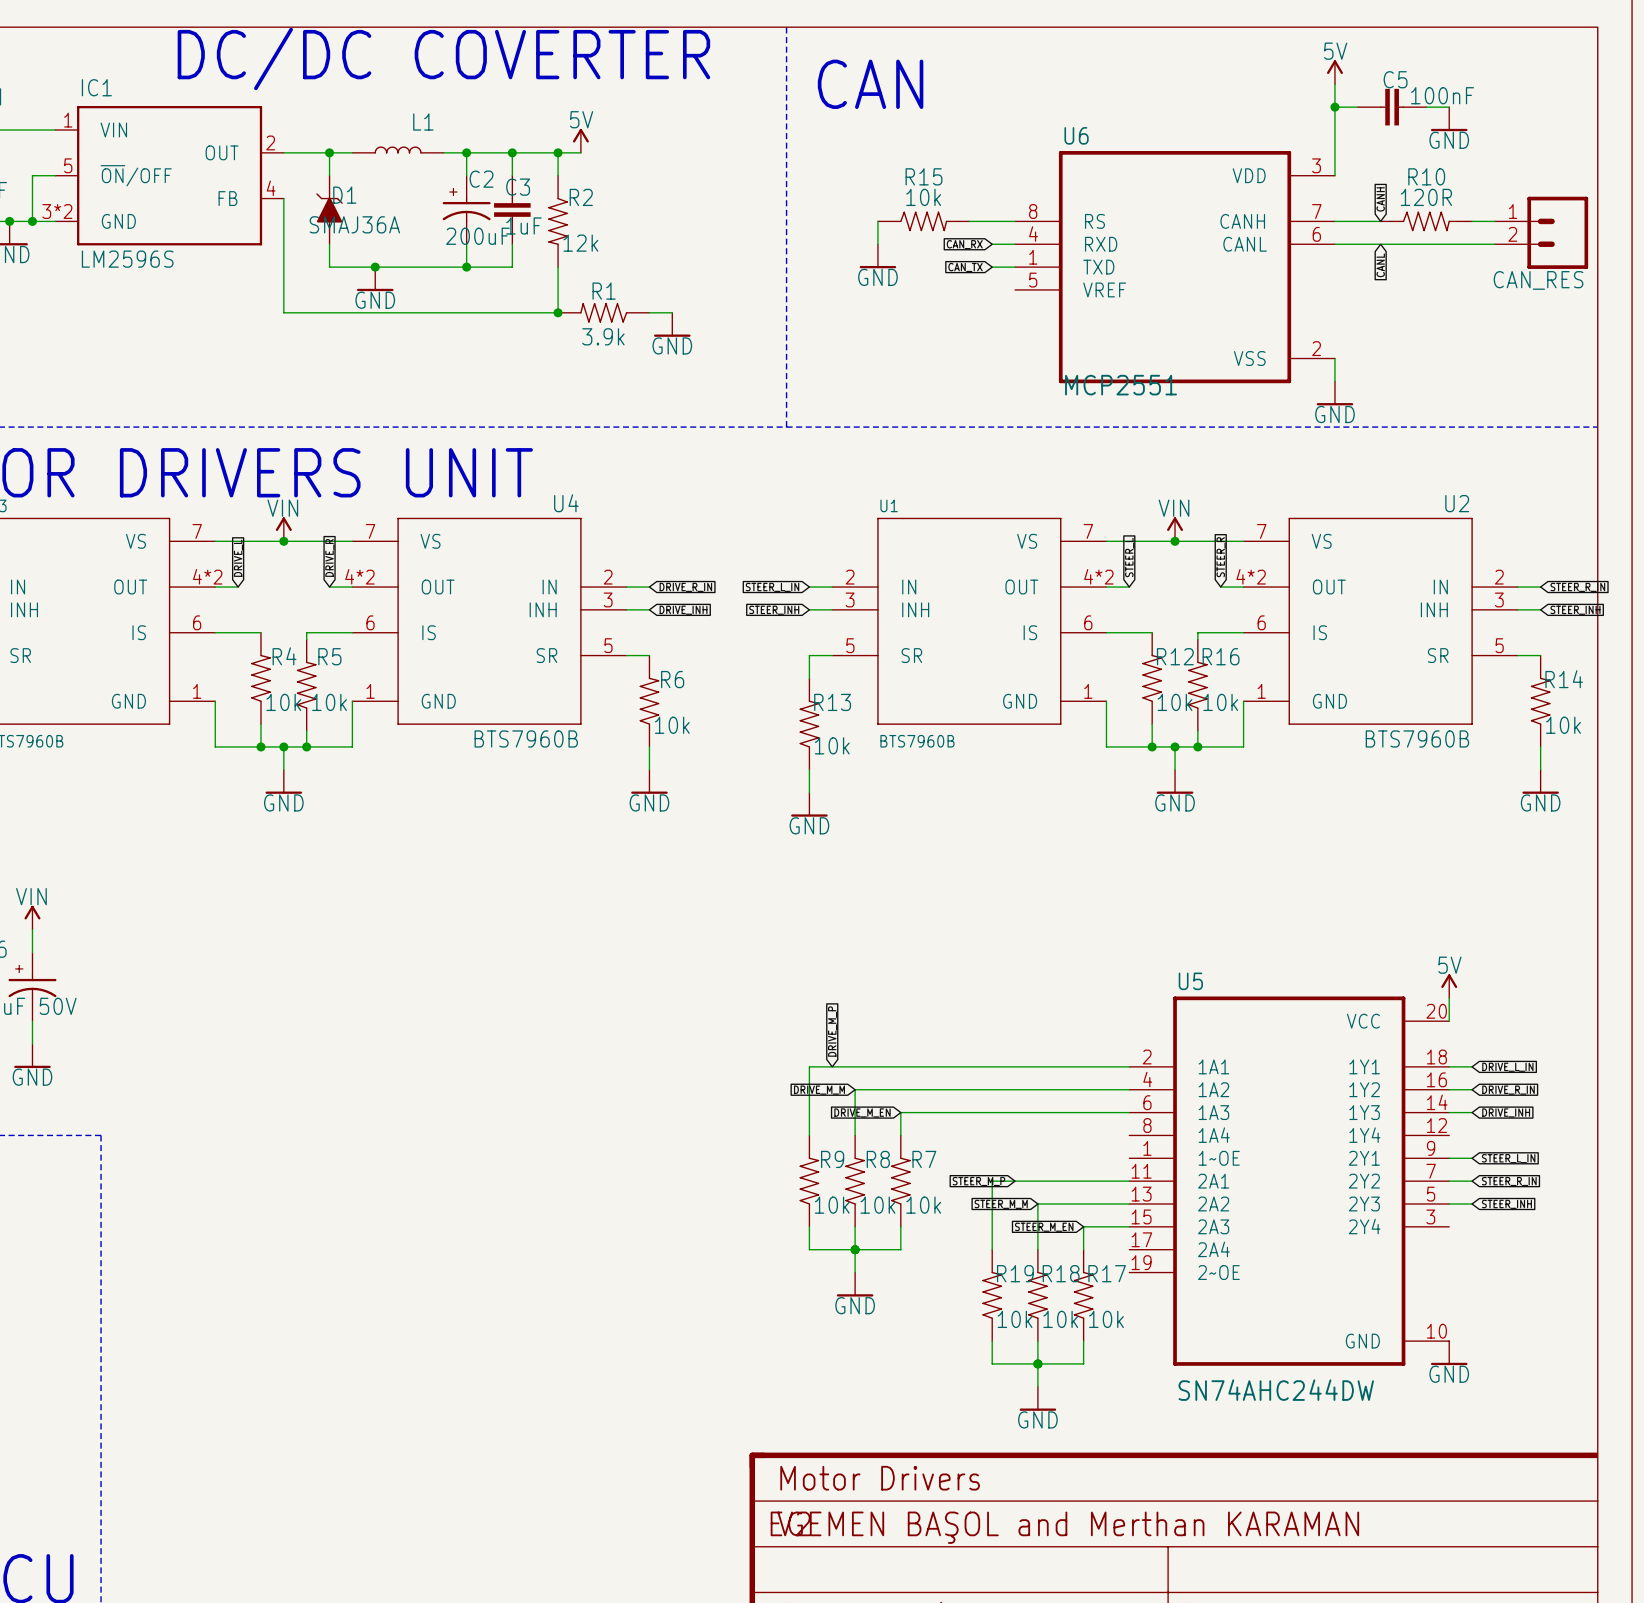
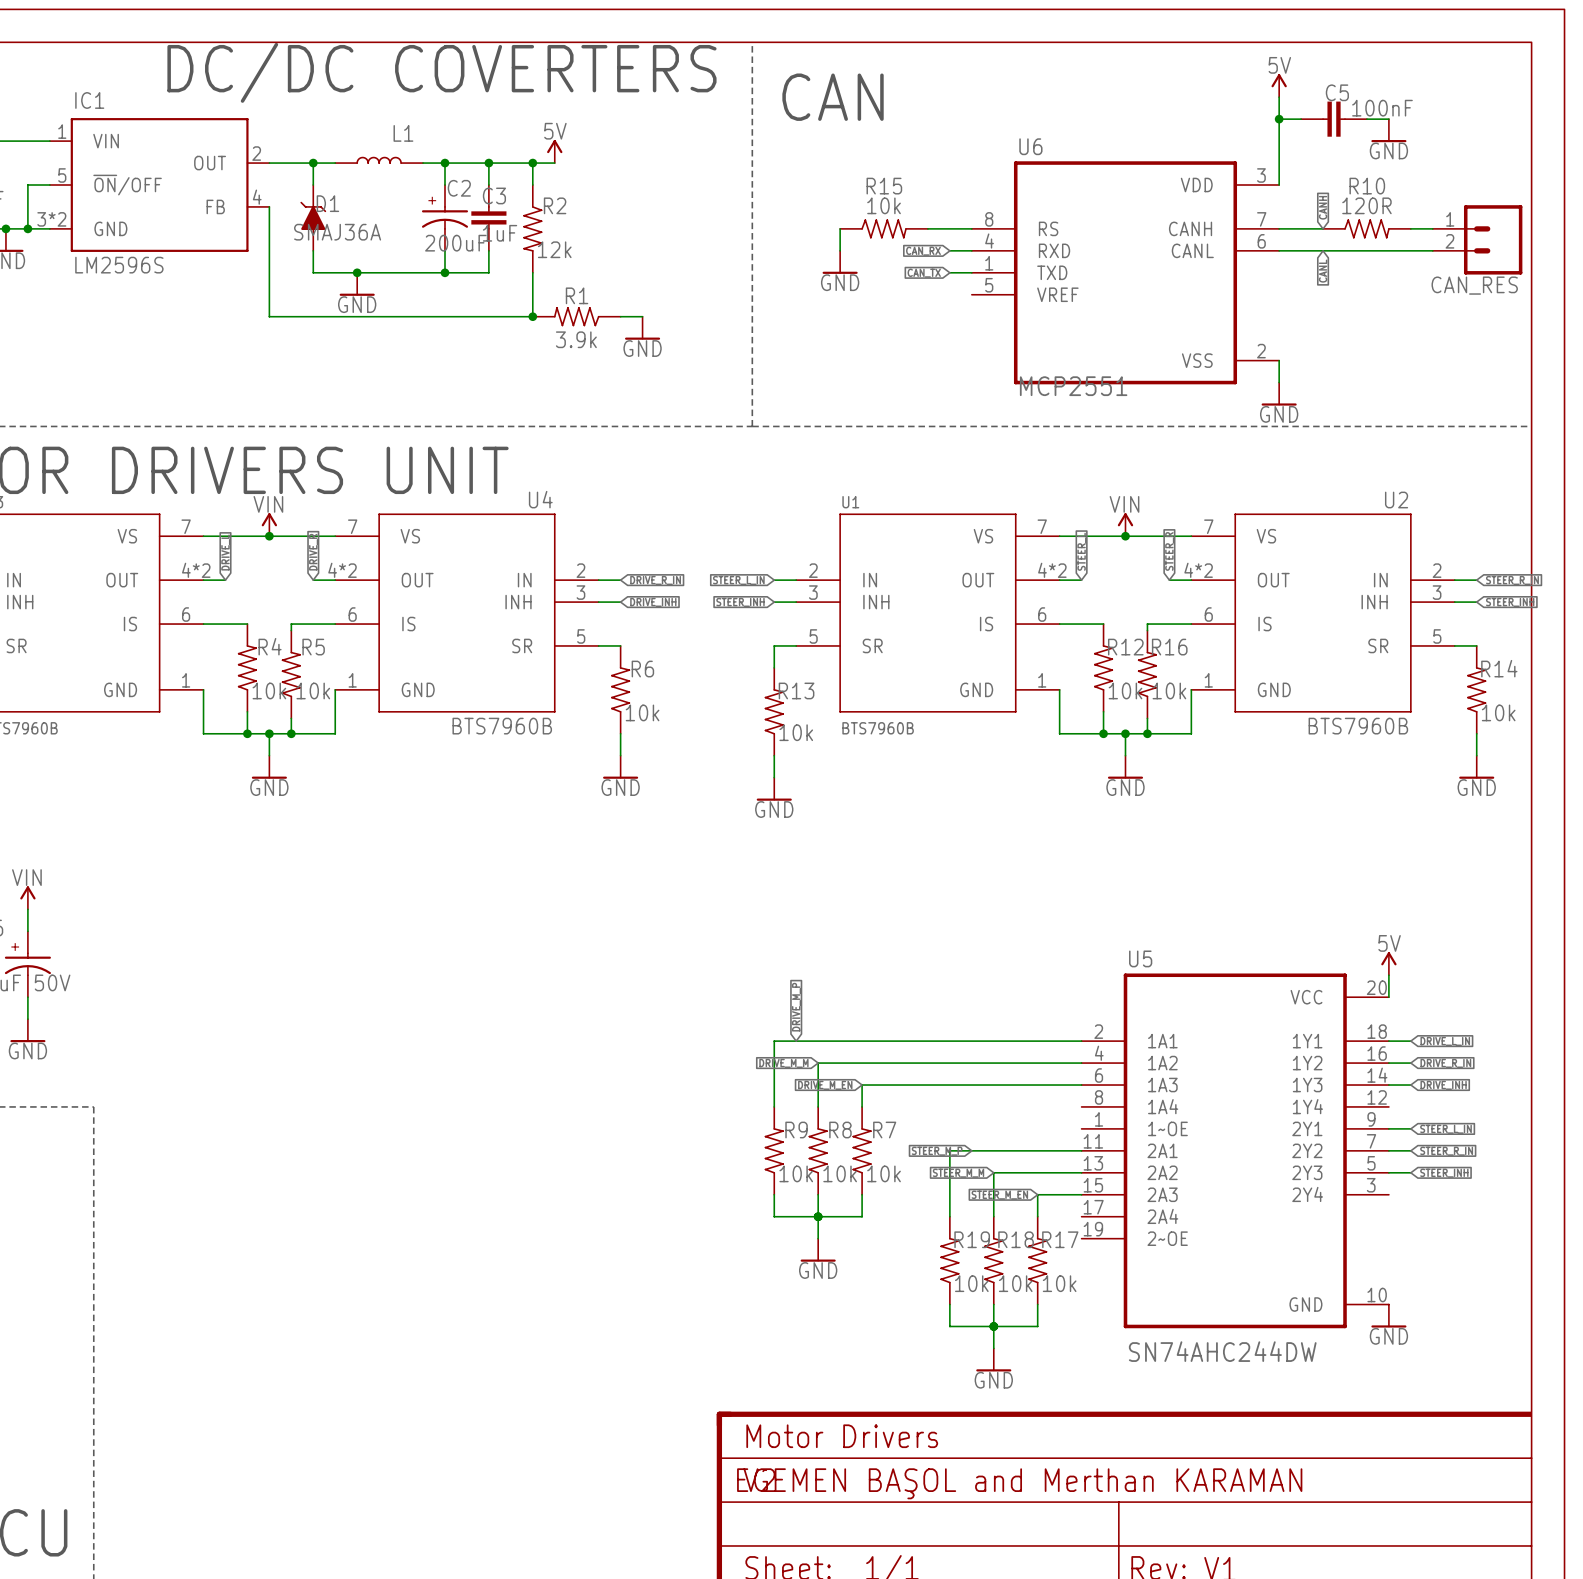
text: DC/DC COVERTER (443, 58) -> DC/DC COVERTERS (441, 72)

